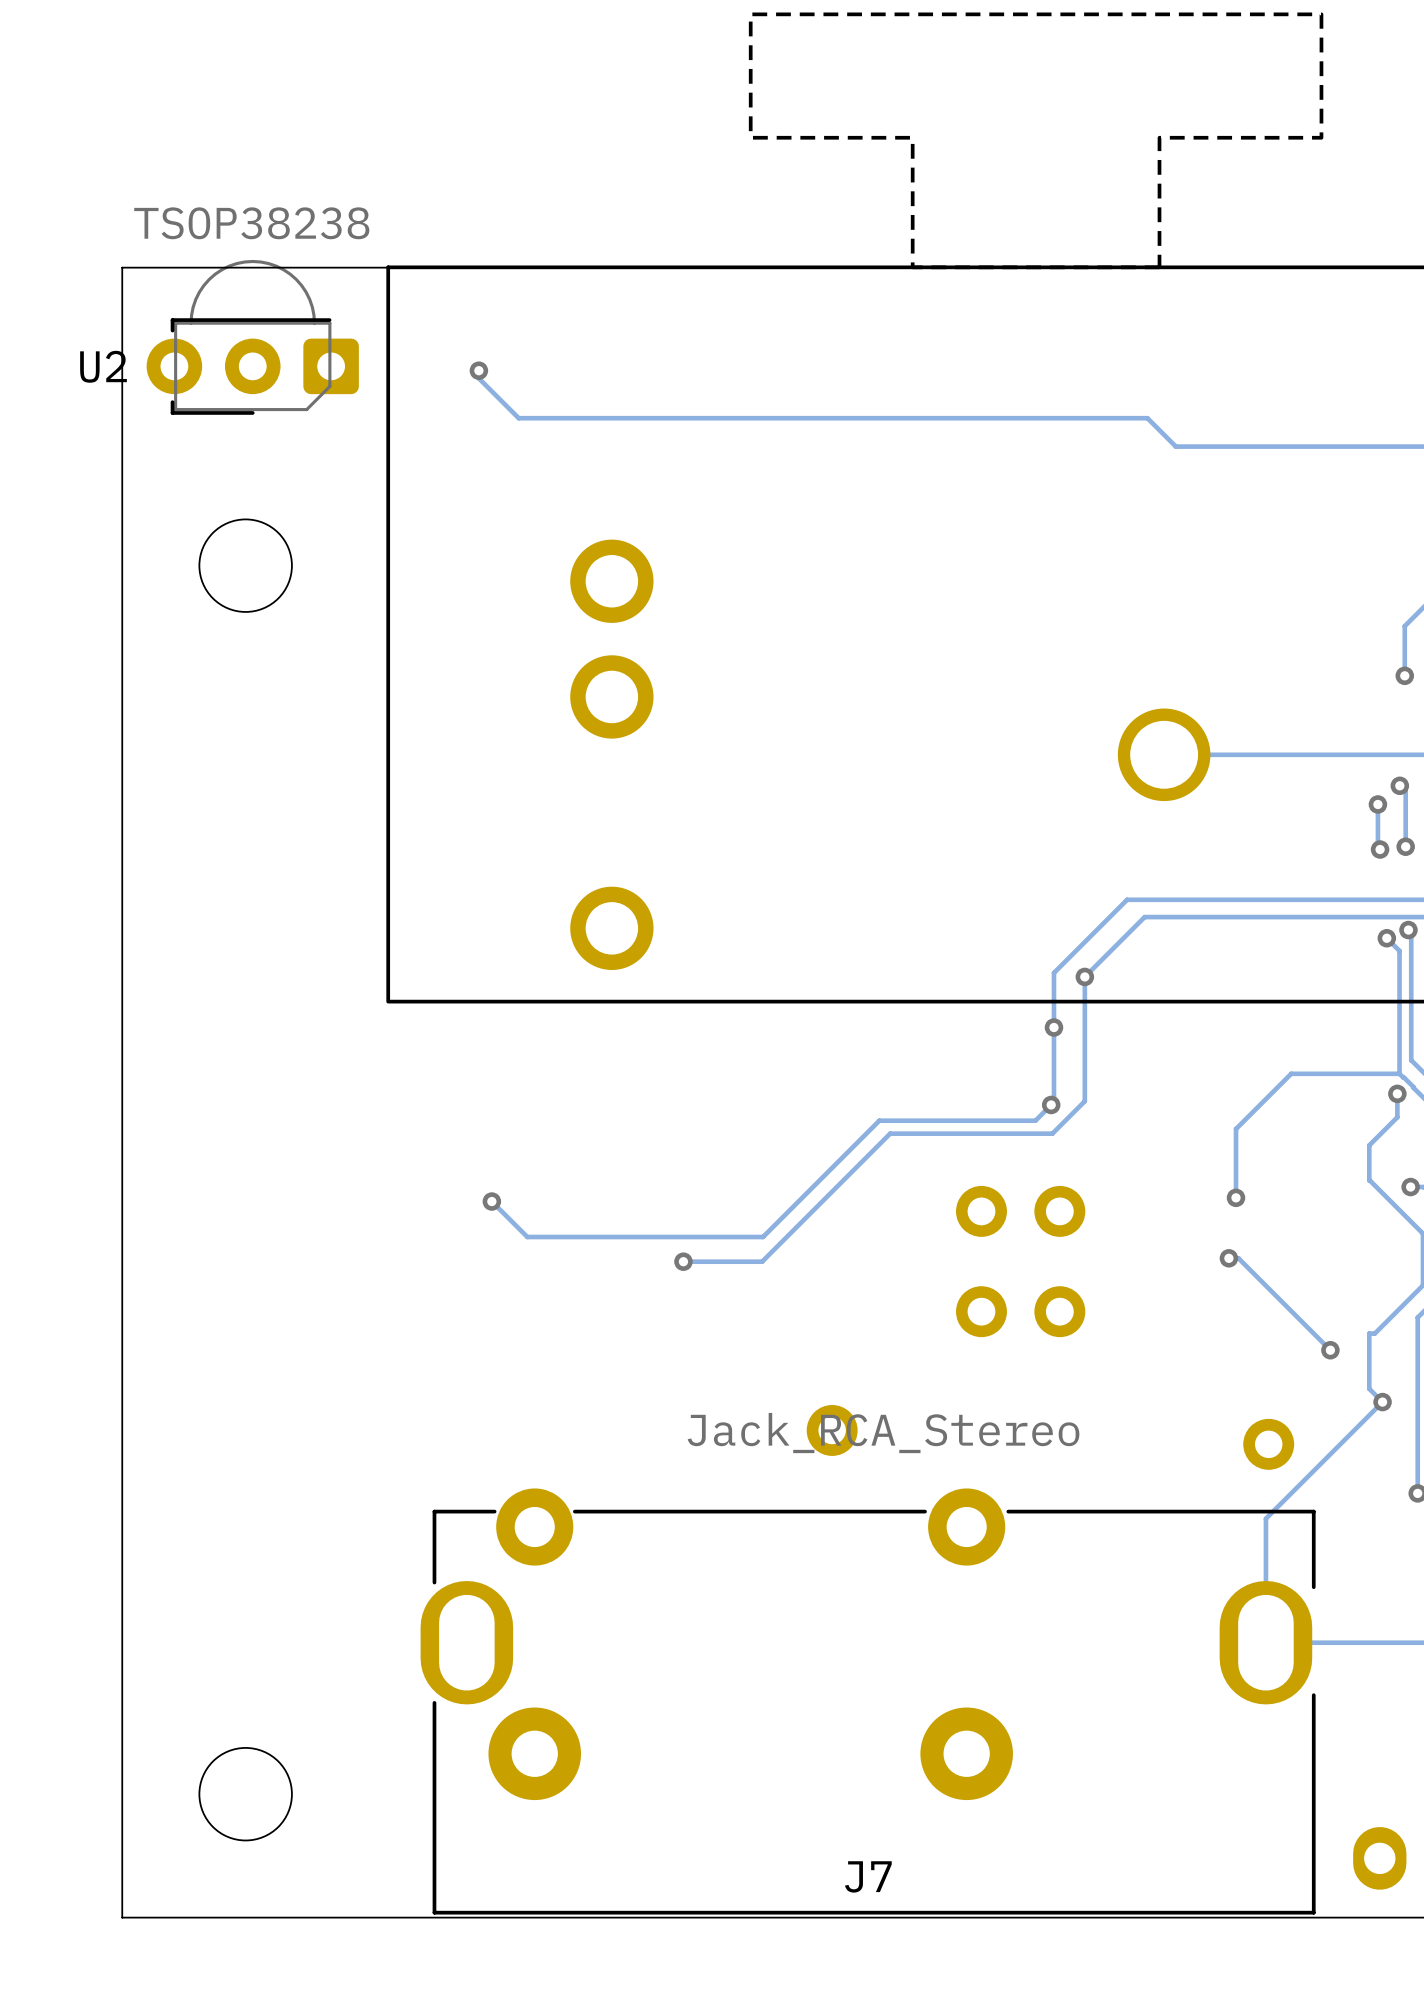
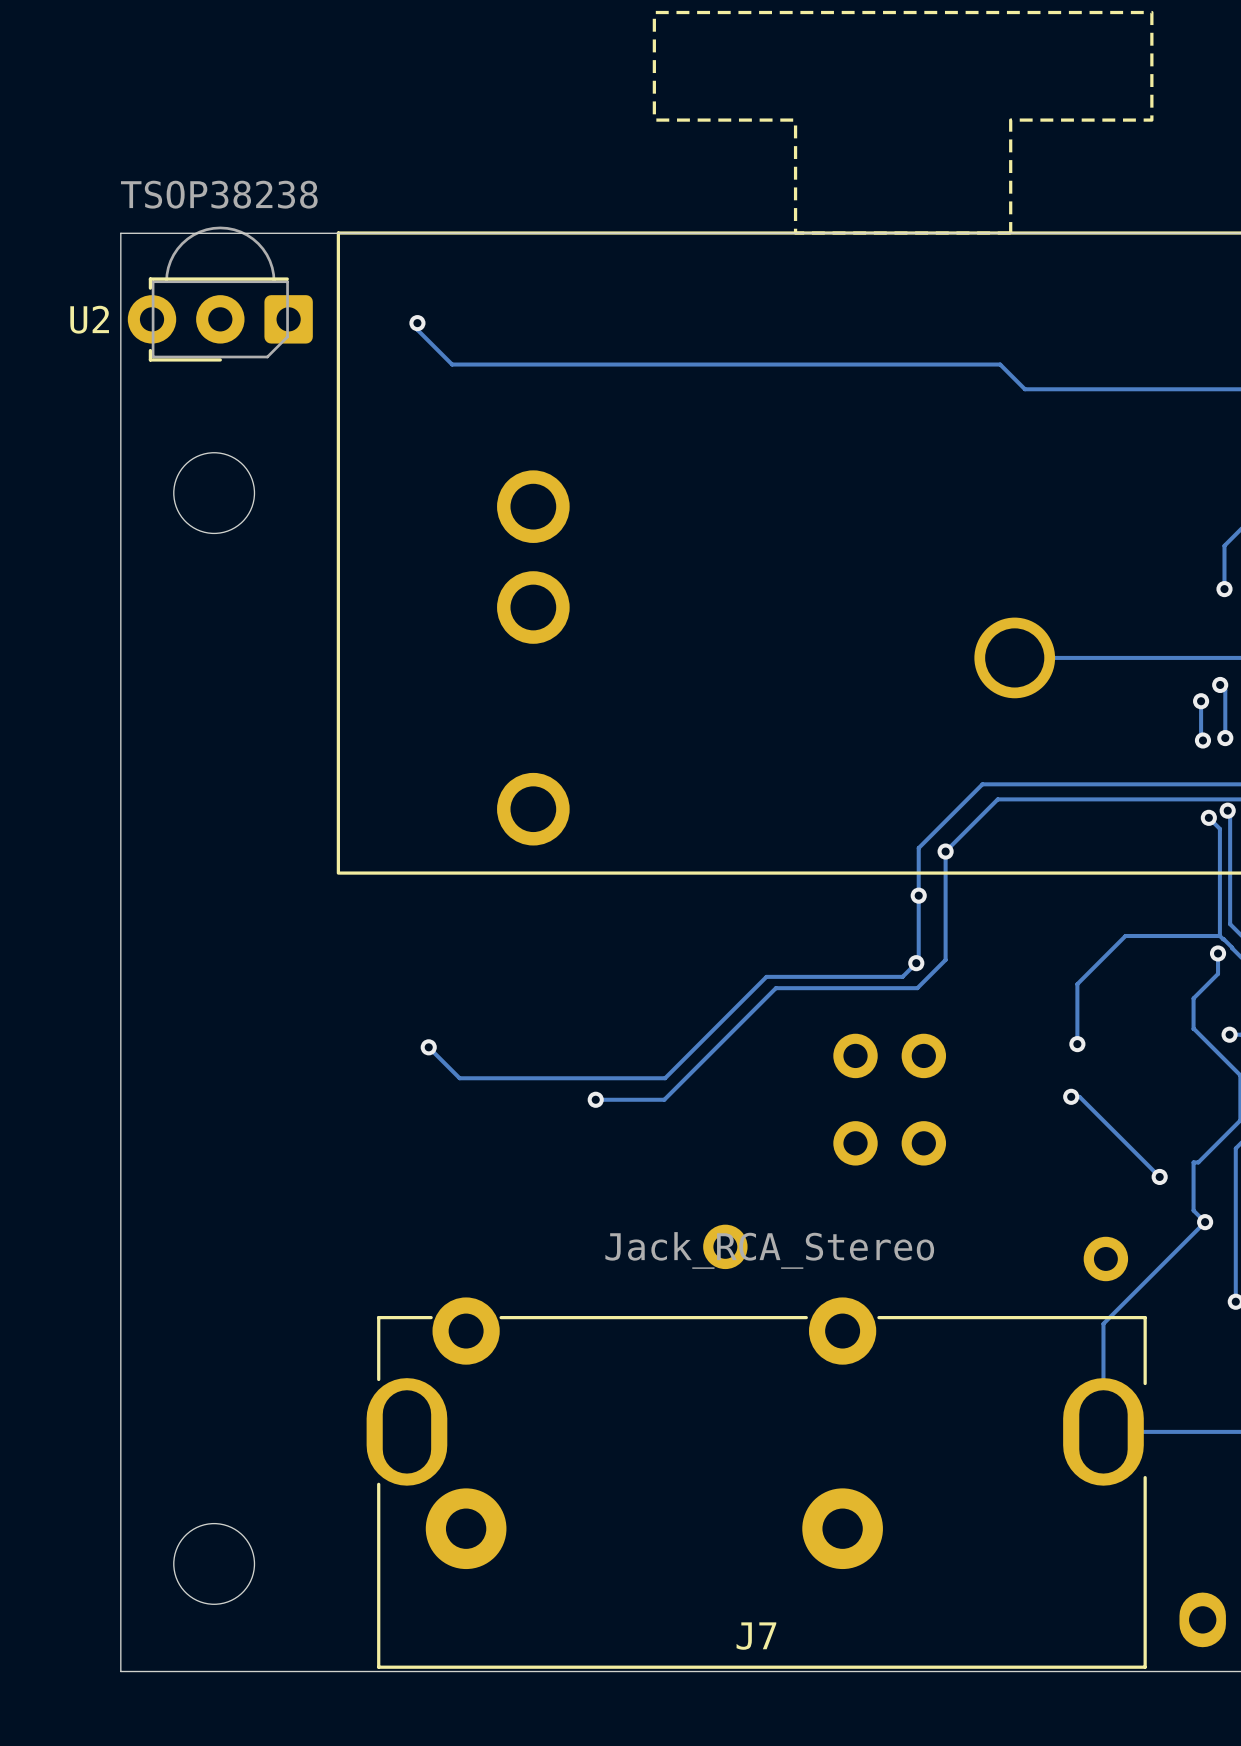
board edge: (138, 267) (122, 267) (122, 1917) (138, 1917) -> (120, 233) (120, 1671)

